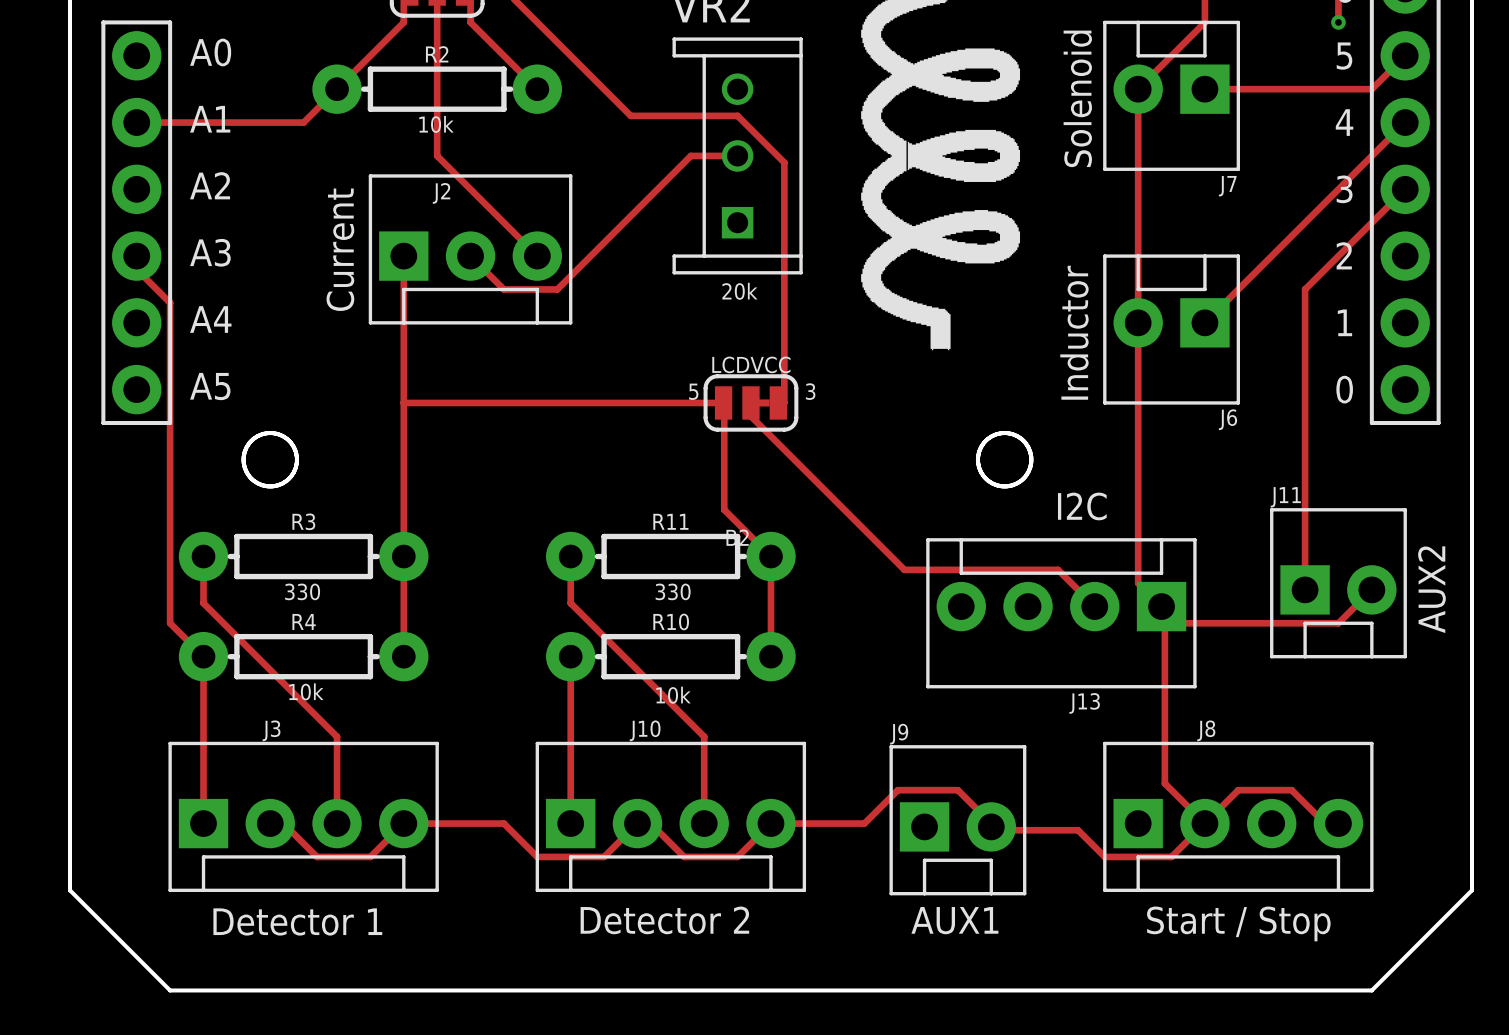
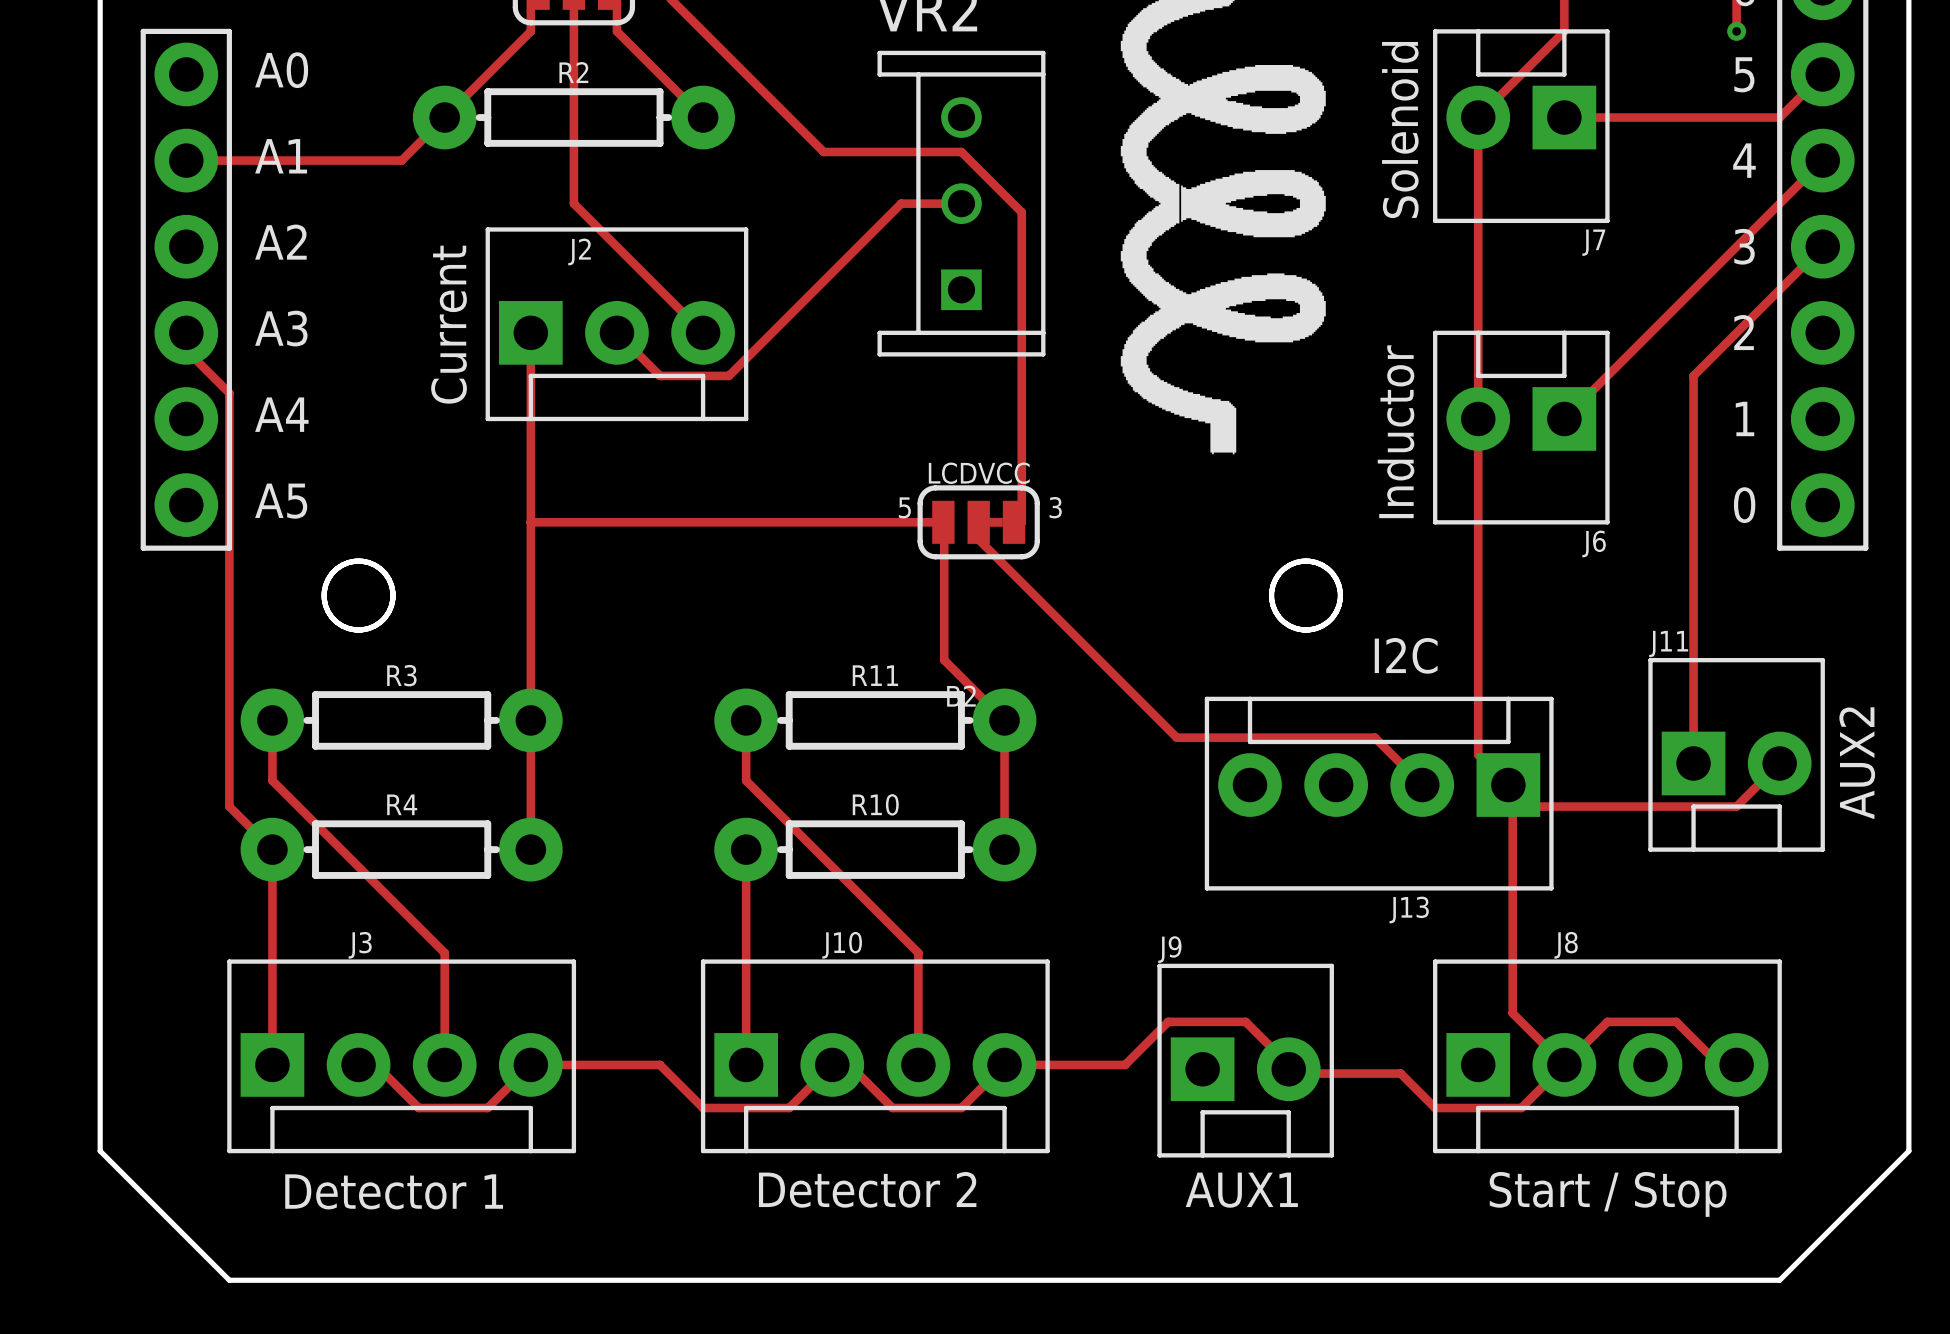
text: 10k (436, 124) -> none
text: 20k (739, 291) -> none
text: 330 (302, 591) -> none
text: 330 (673, 591) -> none
text: 10k (306, 691) -> none
text: 10k (673, 695) -> none

